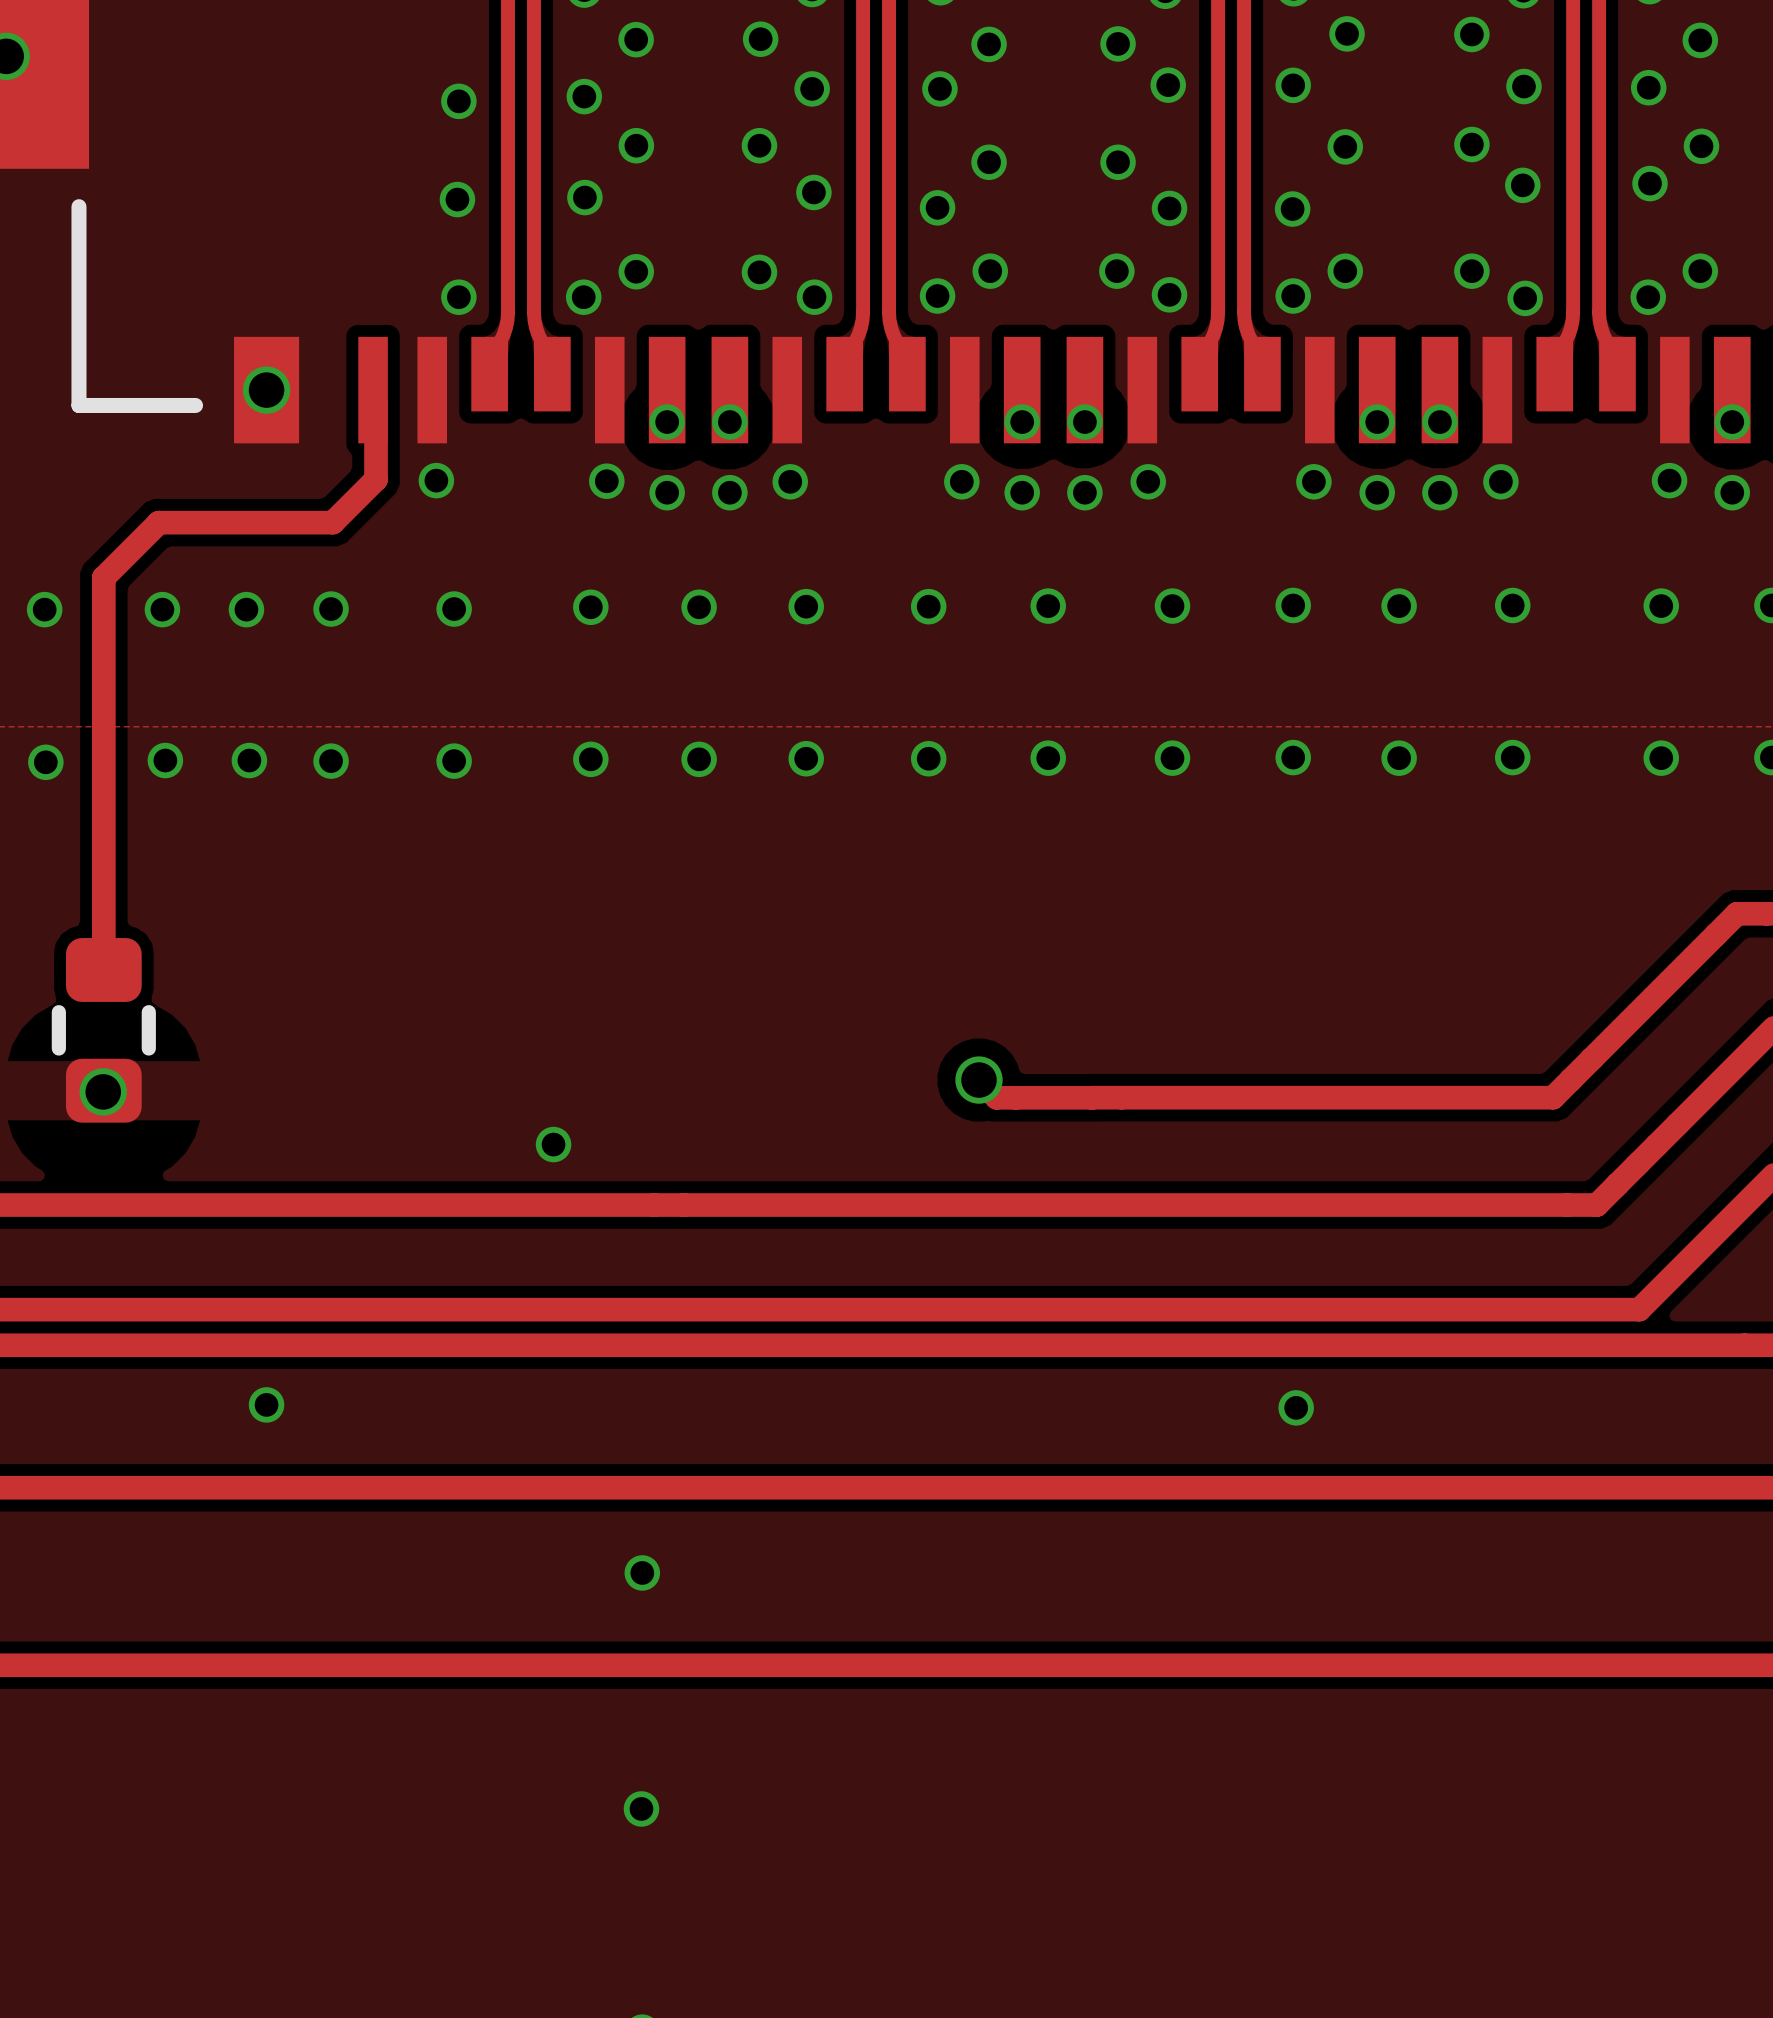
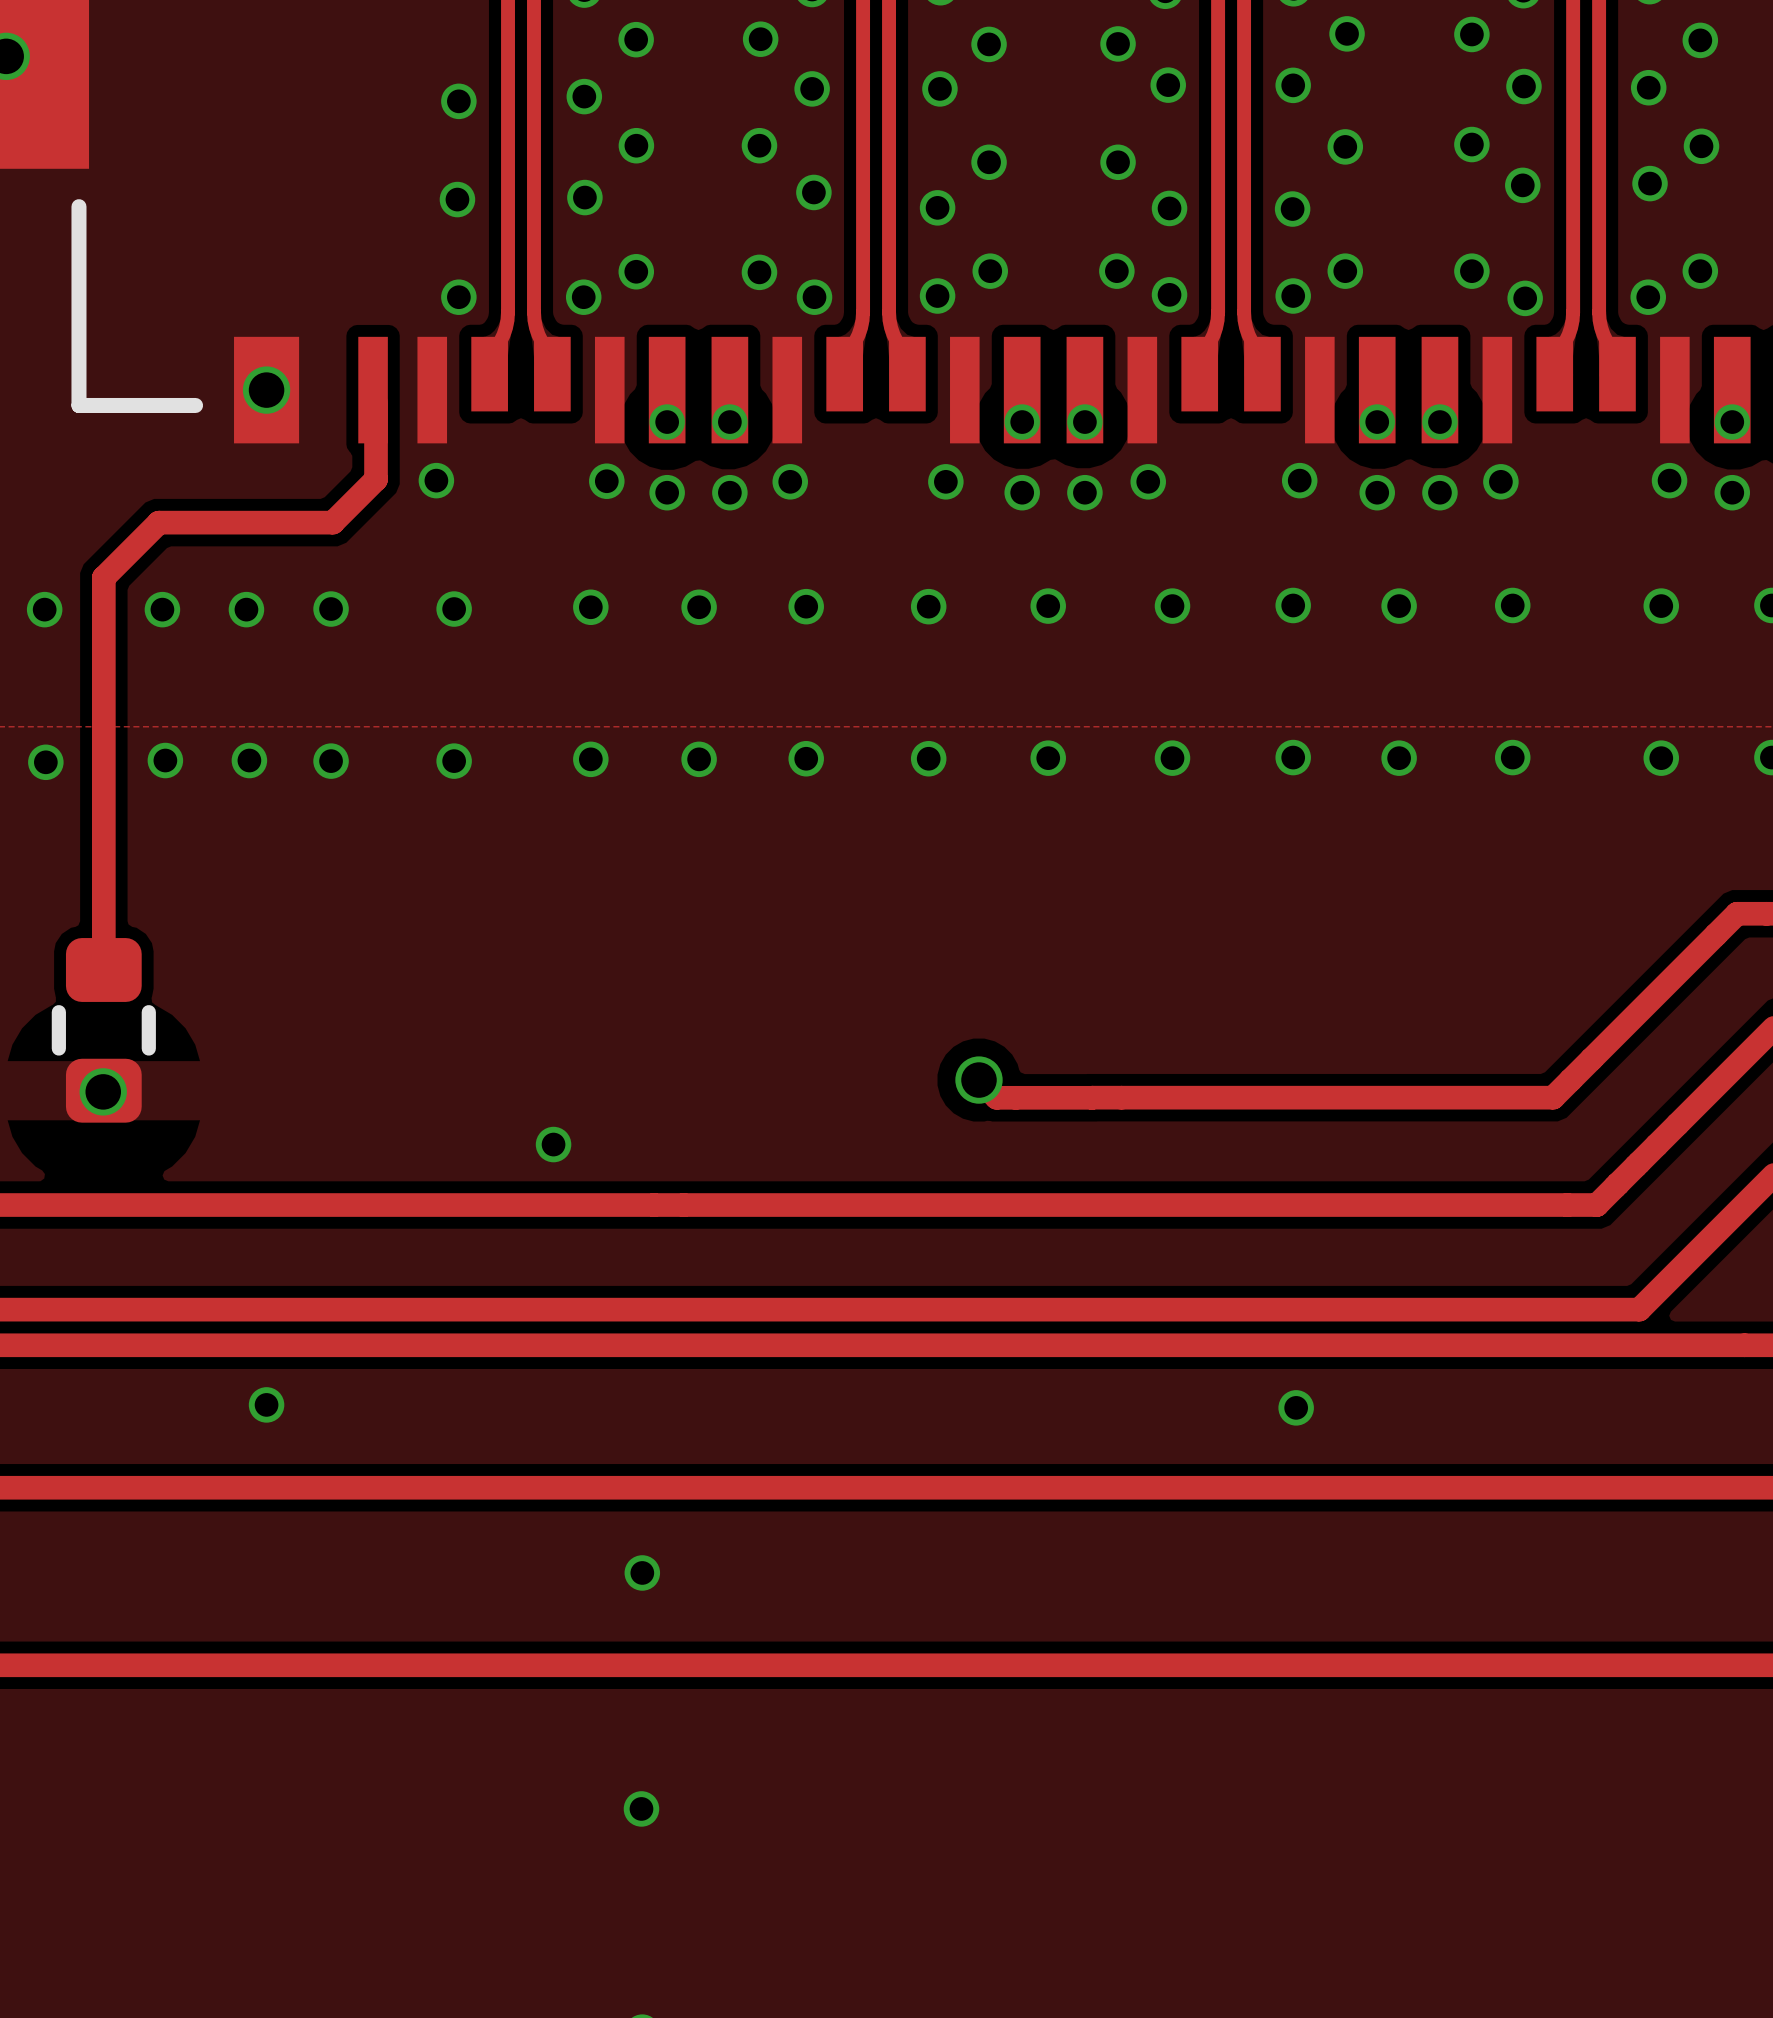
via position: (961, 481) -> (945, 481)
via position: (1313, 481) -> (1299, 480)

